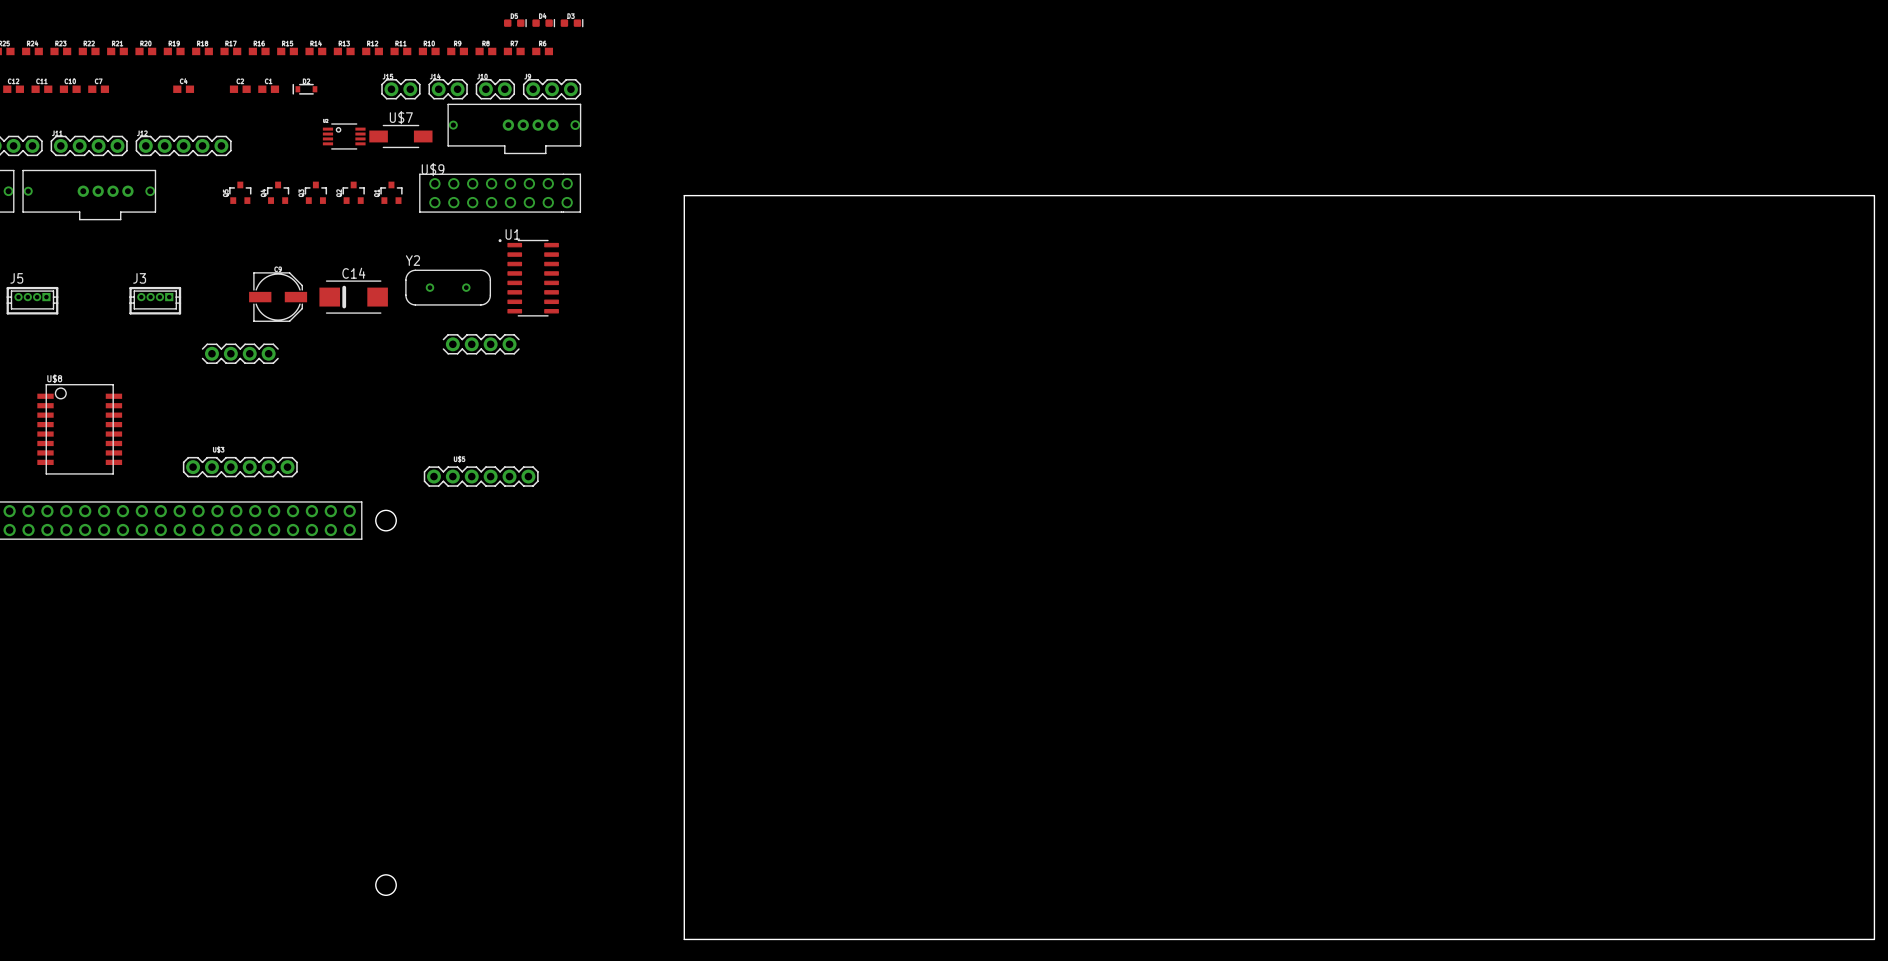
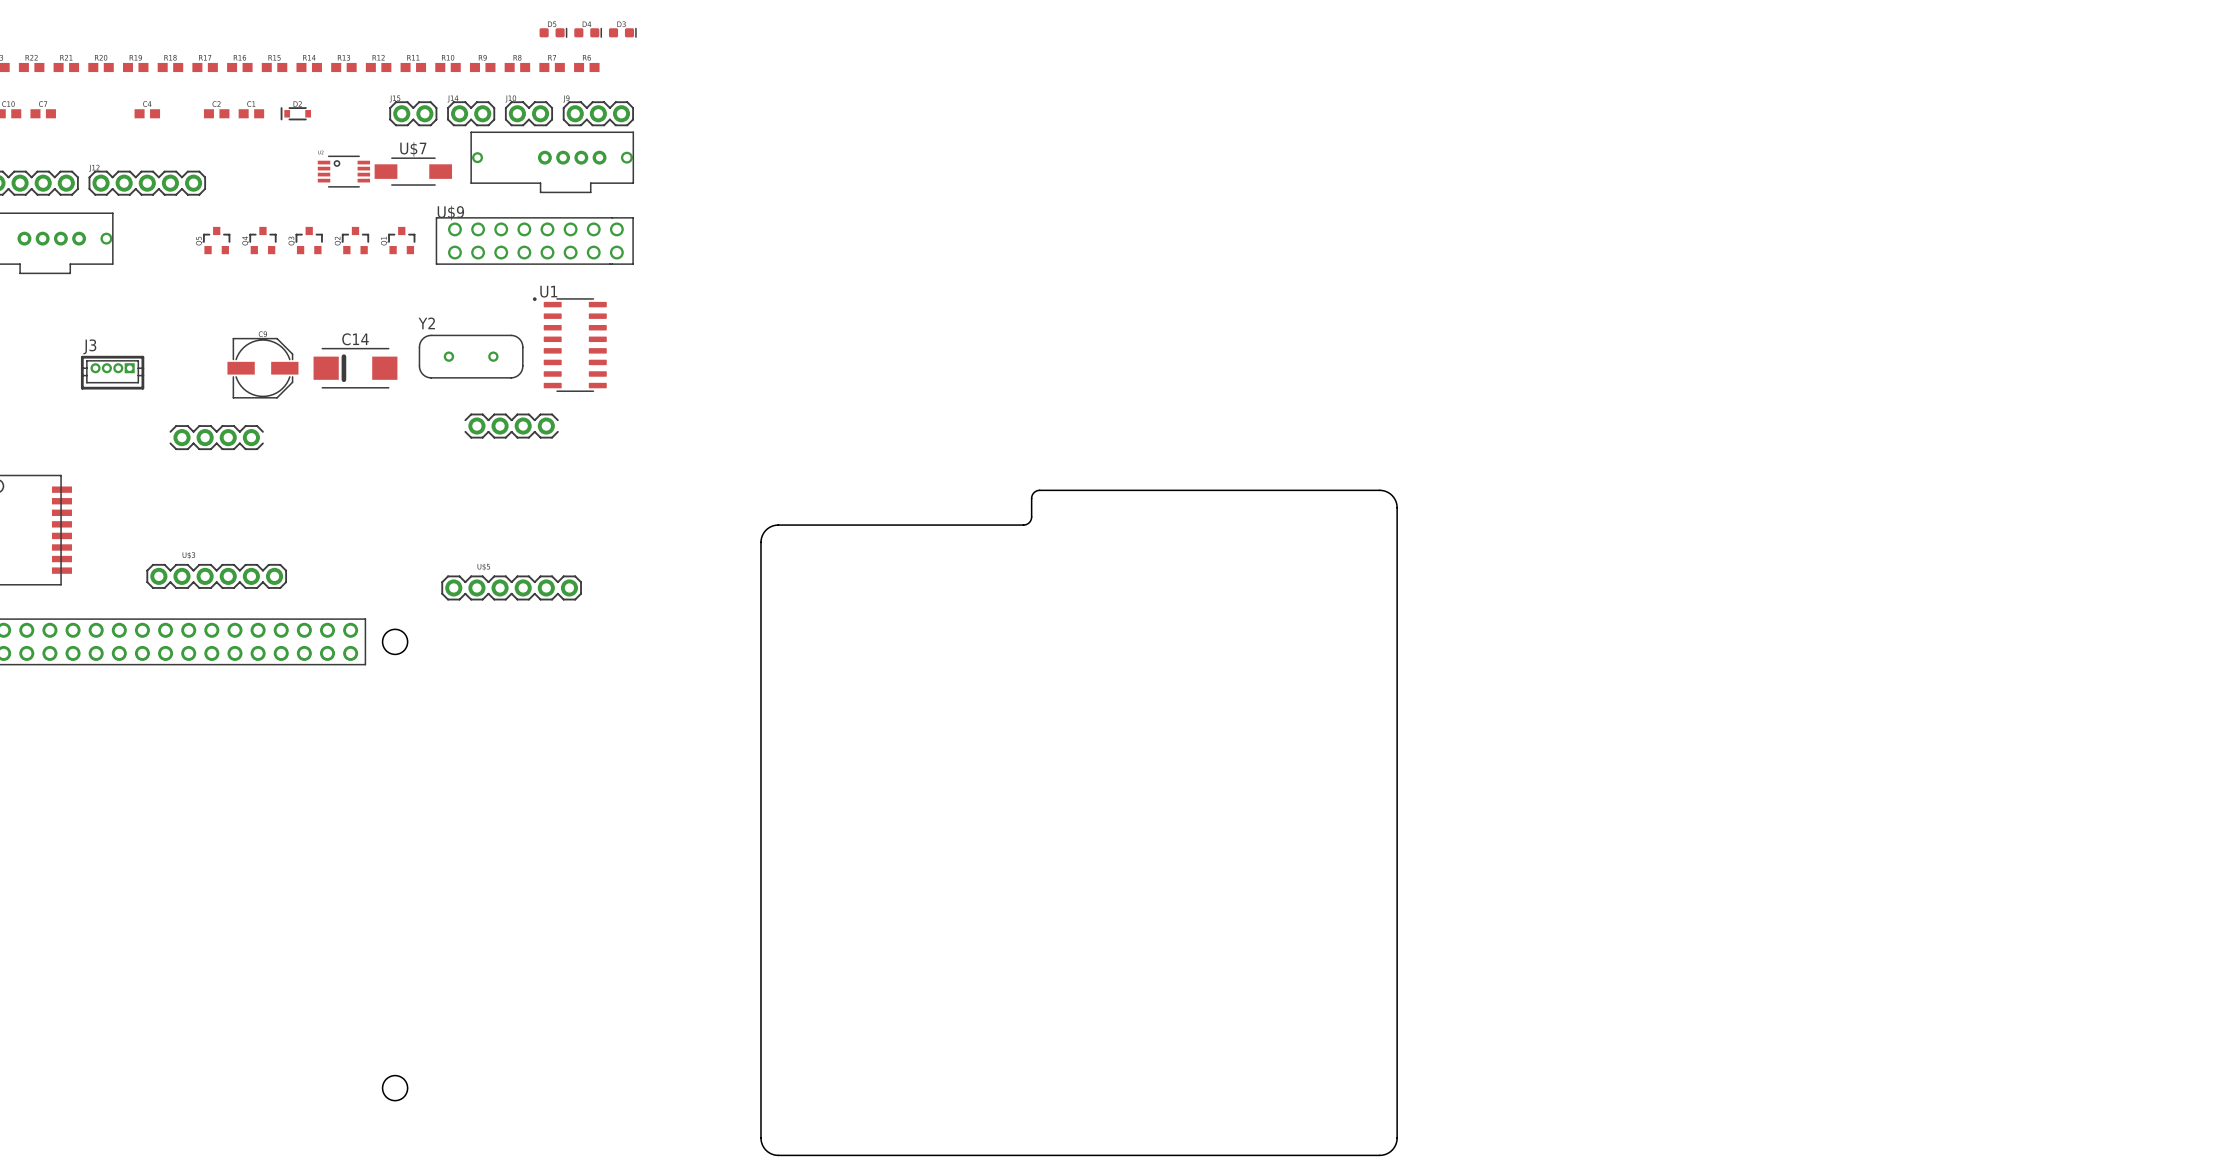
board edge: (684, 195) (1874, 195) (1874, 939) (684, 939) (684, 195) -> none
board edge: none -> (1039, 490) (1379, 490) (1388, 492) (1394, 499) (1397, 507) (1397, 1138) (1394, 1146) (1388, 1153) (1379, 1155) (778, 1155) (769, 1153) (763, 1146) (760, 1138) (762, 535) (769, 527) (778, 525) (1024, 524) (1031, 519) (1032, 495) (1039, 490)

